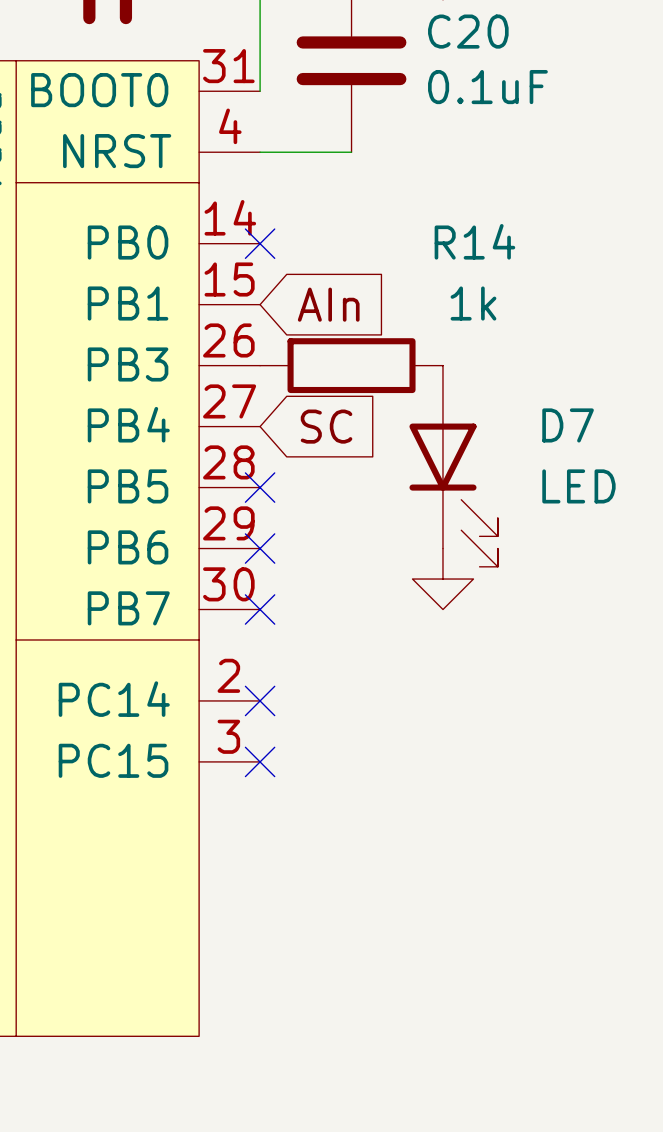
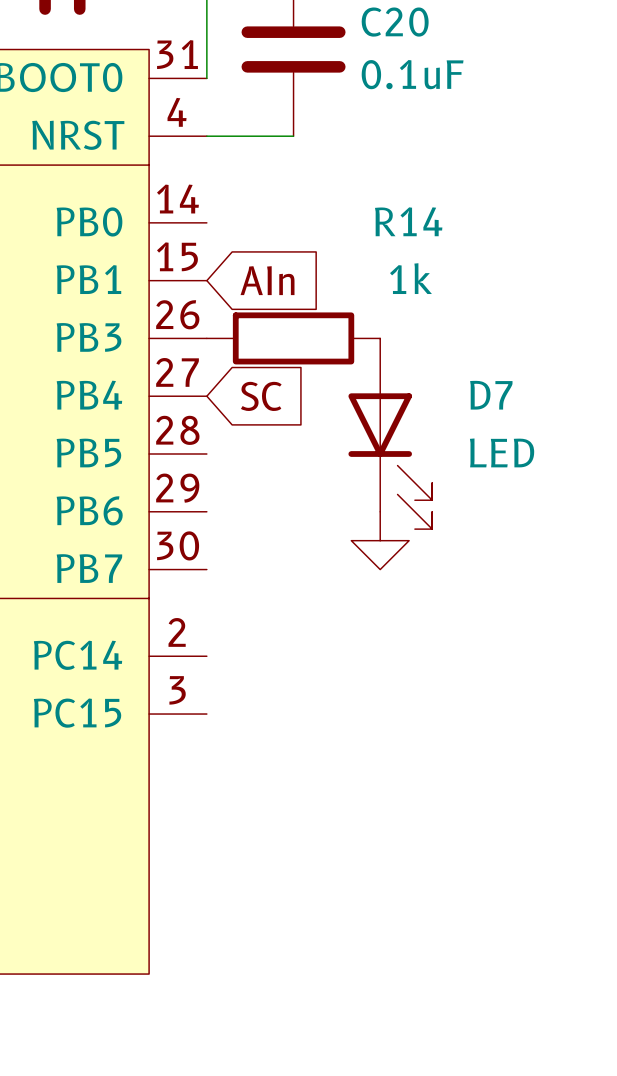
no-connect mark: (260, 243) -> none
no-connect mark: (260, 487) -> none
no-connect mark: (260, 548) -> none
no-connect mark: (260, 609) -> none
no-connect mark: (260, 700) -> none
no-connect mark: (260, 761) -> none

